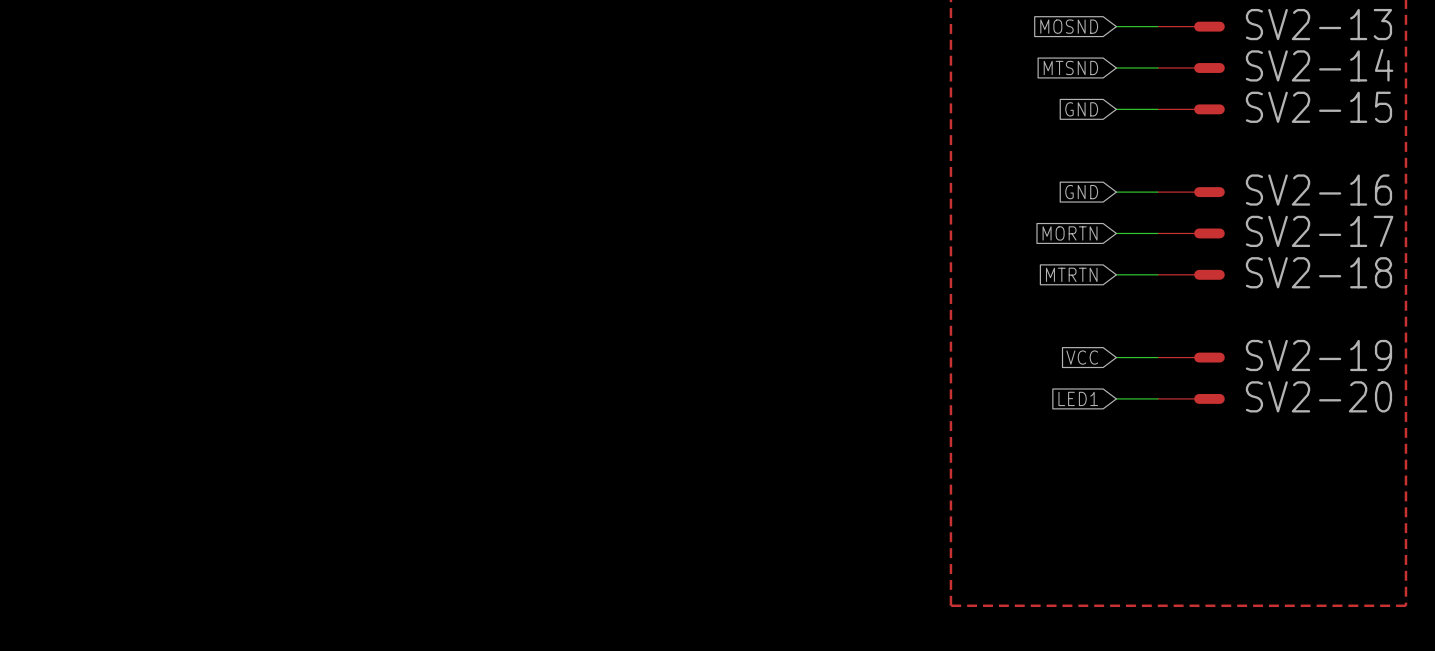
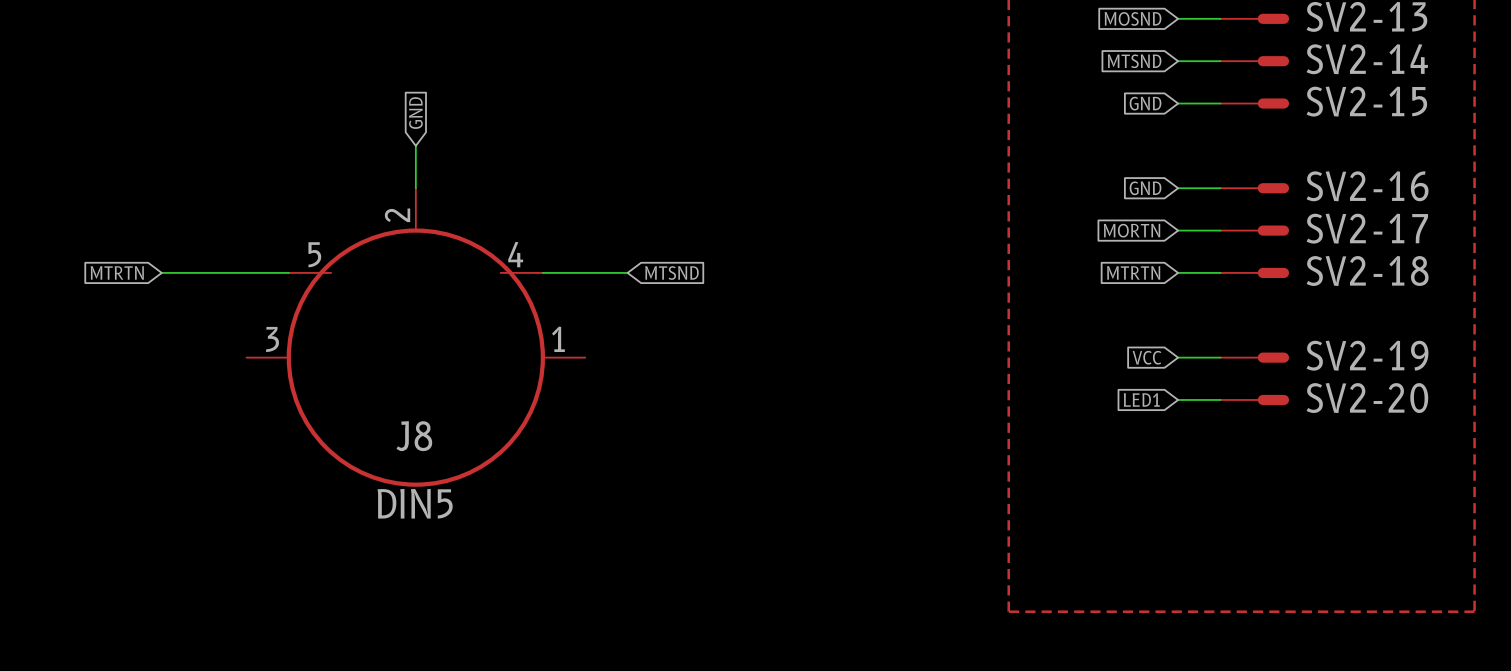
global label: none -> GND (415, 113)
wire: none -> (415, 145) (415, 188)
global label: none -> MTRTN (117, 272)
wire: none -> (161, 272) (288, 272)
wire: none -> (542, 272) (627, 272)
global label: none -> MTSND (671, 273)
J8: none -> DIN5 (415, 337)

